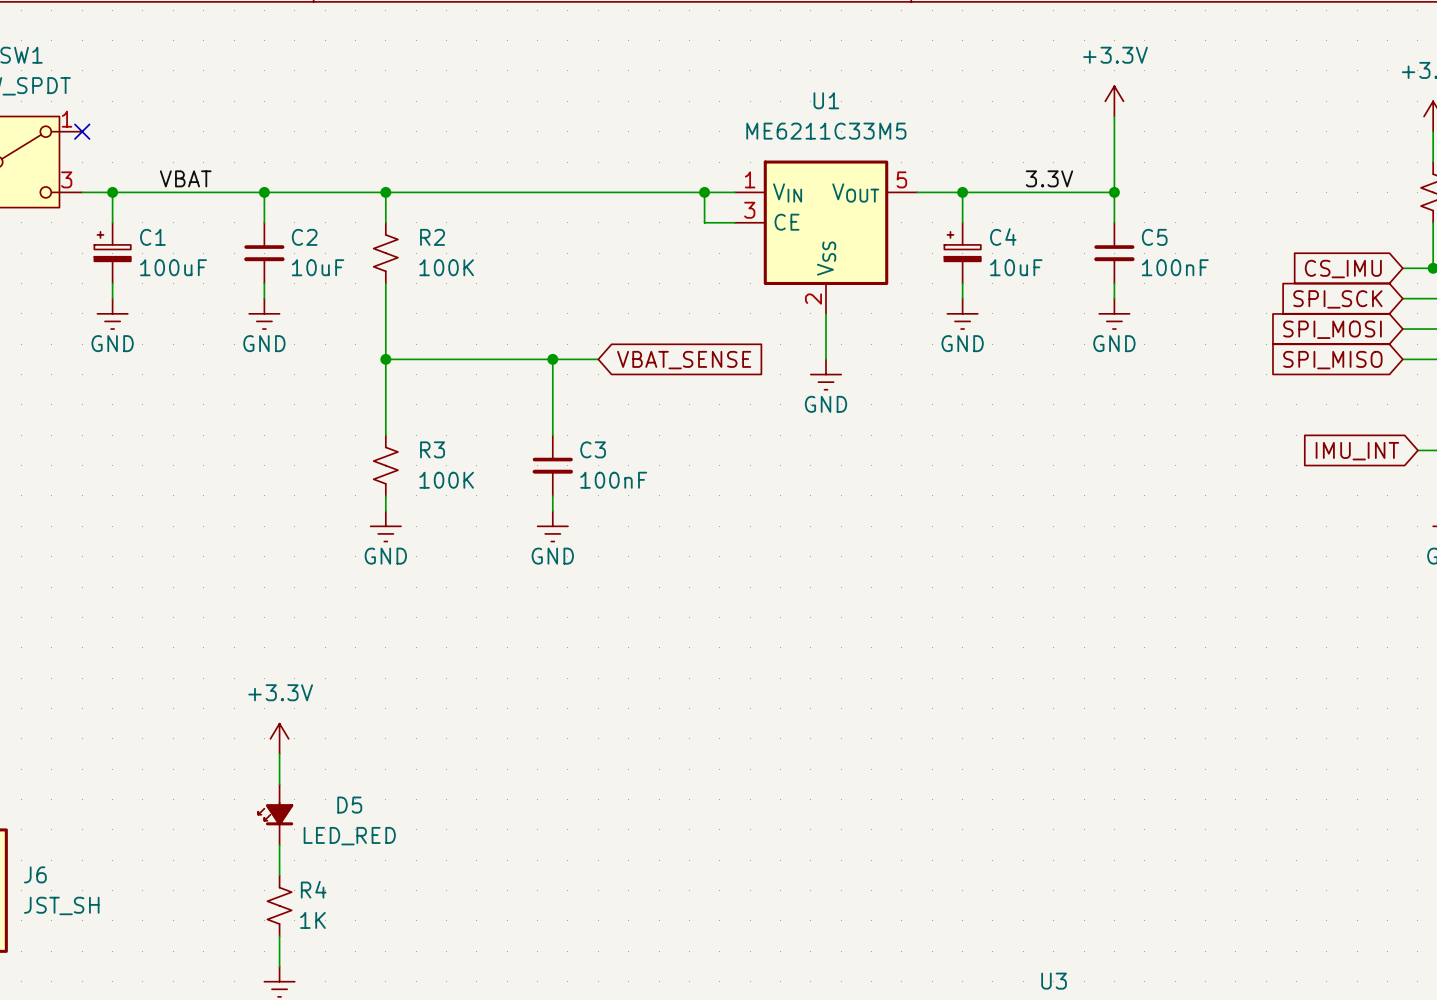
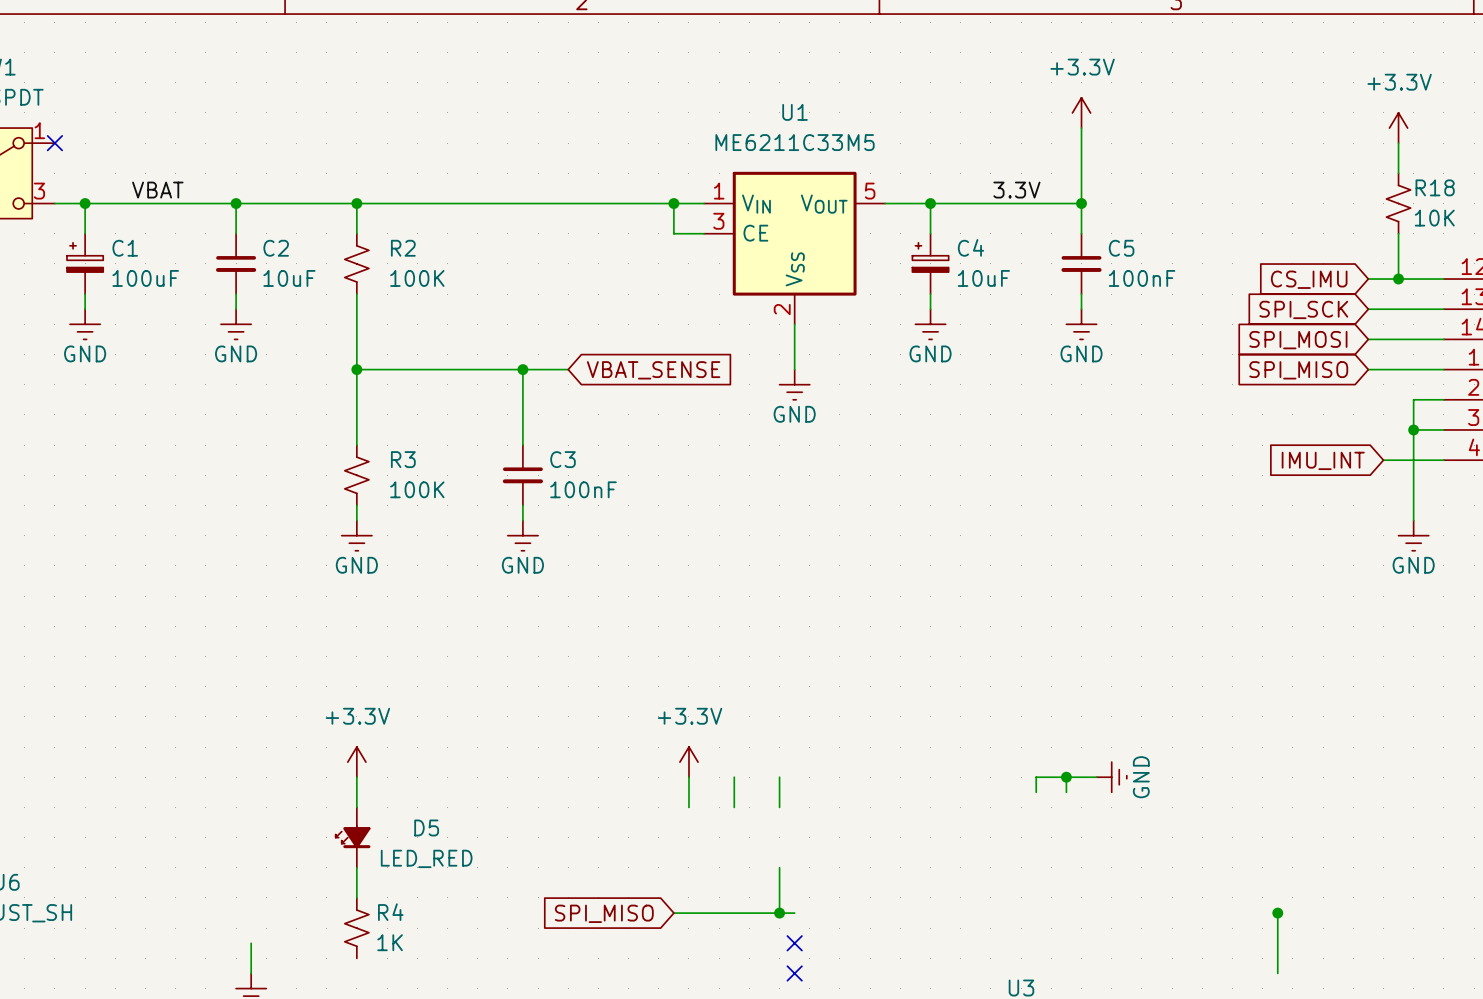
power symbol position: +3.3V (279, 738) -> +3.3V (356, 762)
wire: (279, 754) (279, 784) -> (356, 777) (356, 807)
power symbol: none -> +3.3V (688, 762)
wire: none -> (688, 777) (688, 807)
wire: none -> (734, 777) (734, 807)
wire: none -> (779, 777) (779, 807)
wire: none -> (1066, 777) (1066, 792)
junction: none -> (1066, 777)
wire: none -> (1096, 777) (1036, 777) (1036, 792)
power symbol: none -> GND (1111, 777)
D5 position: (275, 814) -> (353, 837)
wire: (279, 845) (279, 875) -> (356, 867) (356, 897)
wire: none -> (779, 867) (779, 913)
R4 position: (279, 905) -> (356, 928)
wire: none -> (673, 913) (794, 913)
junction: none -> (779, 913)
wire: none -> (1277, 913) (1277, 973)
junction: none -> (1277, 913)
global label: none -> SPI_MISO (604, 913)
no-connect mark: none -> (794, 943)
no-connect mark: none -> (794, 973)

